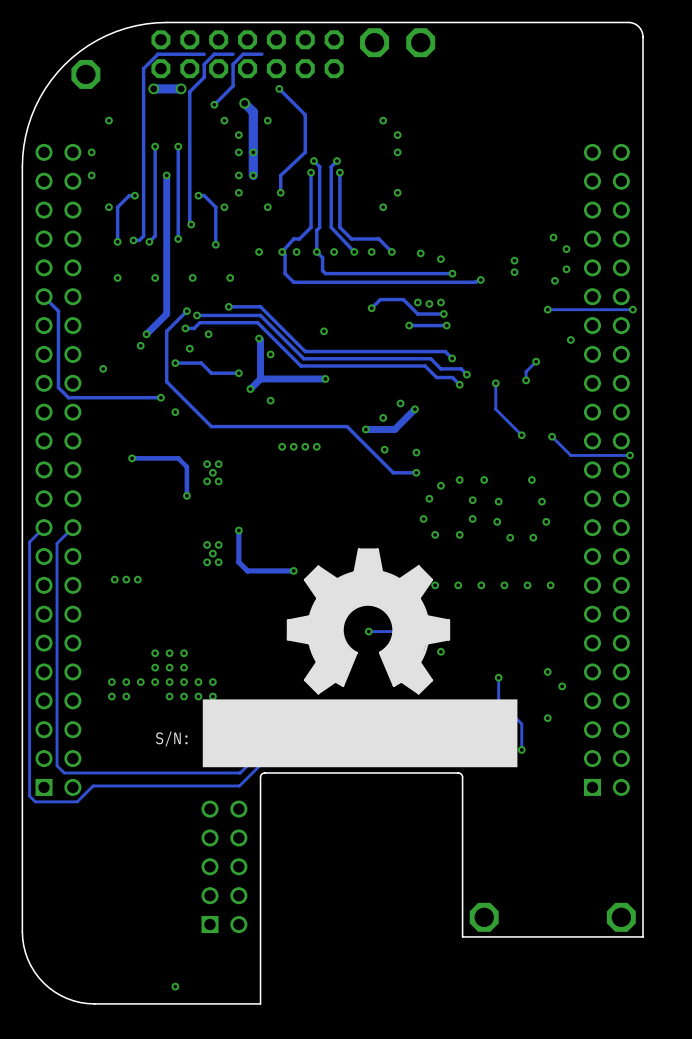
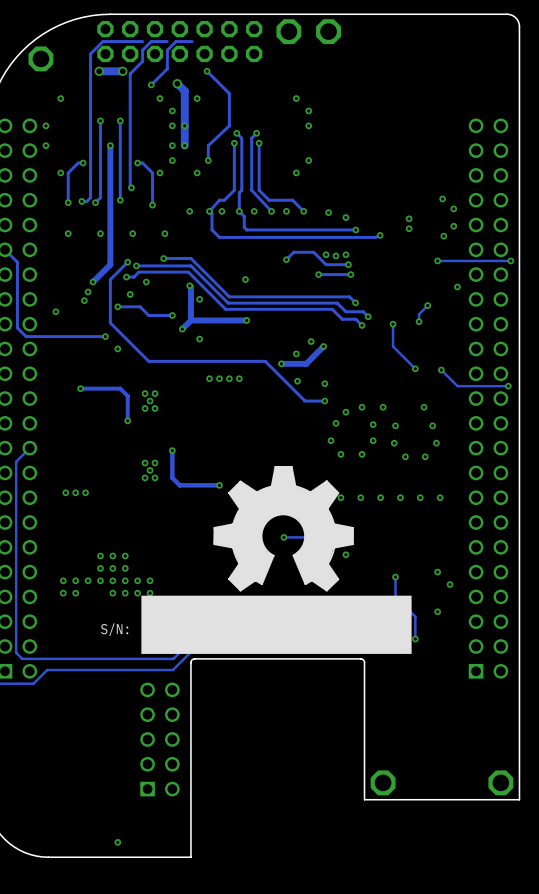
via: none -> (84, 300)

